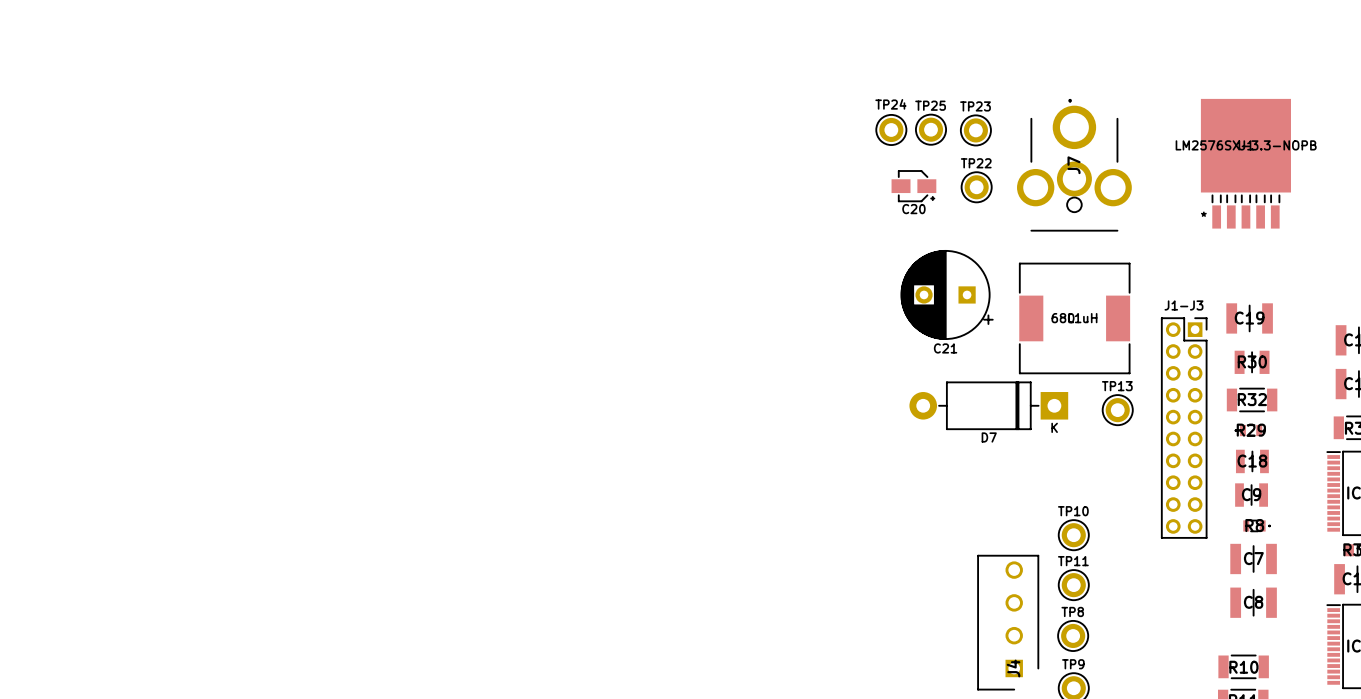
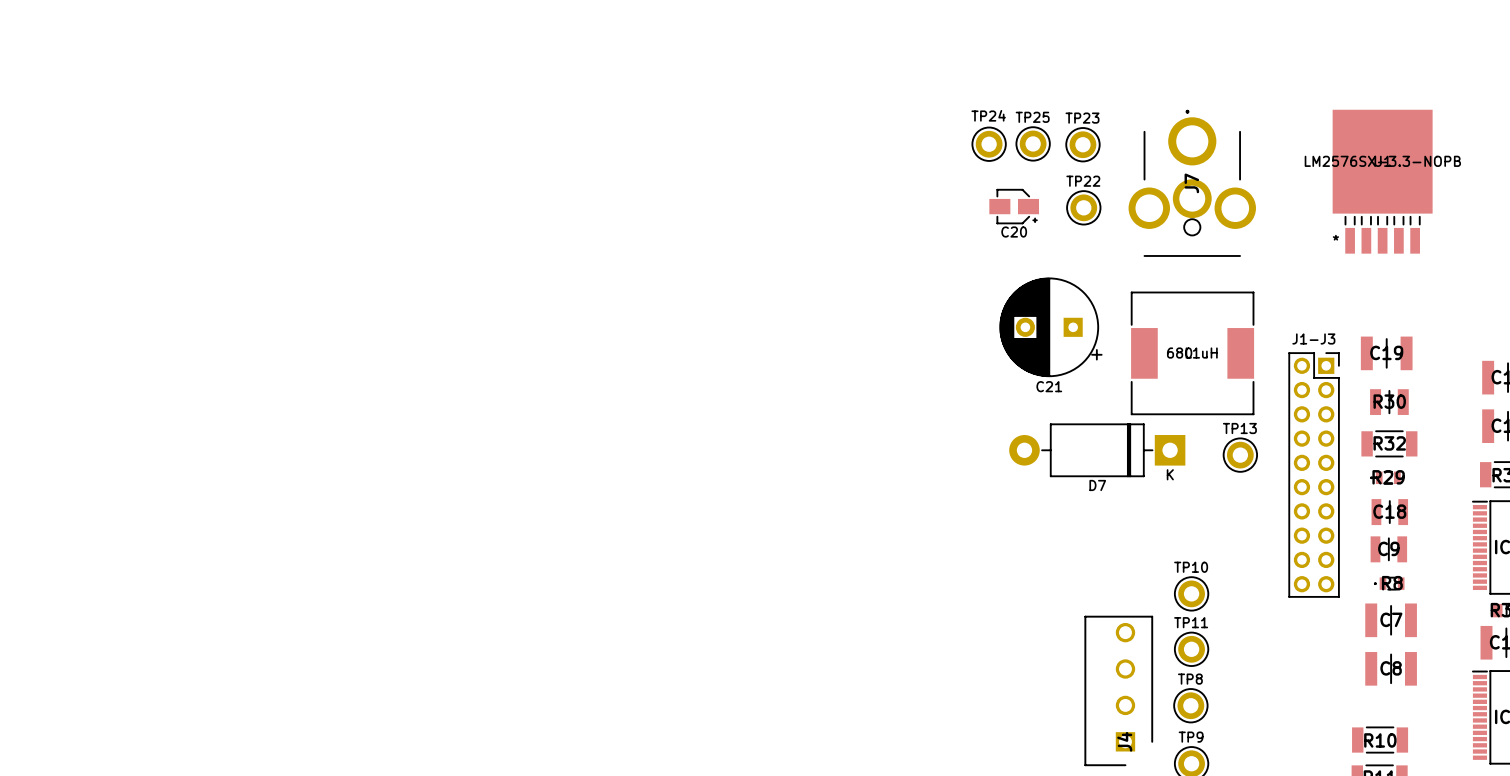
R8 rotation: 0° (1256, 525) -> 180° (1389, 583)

